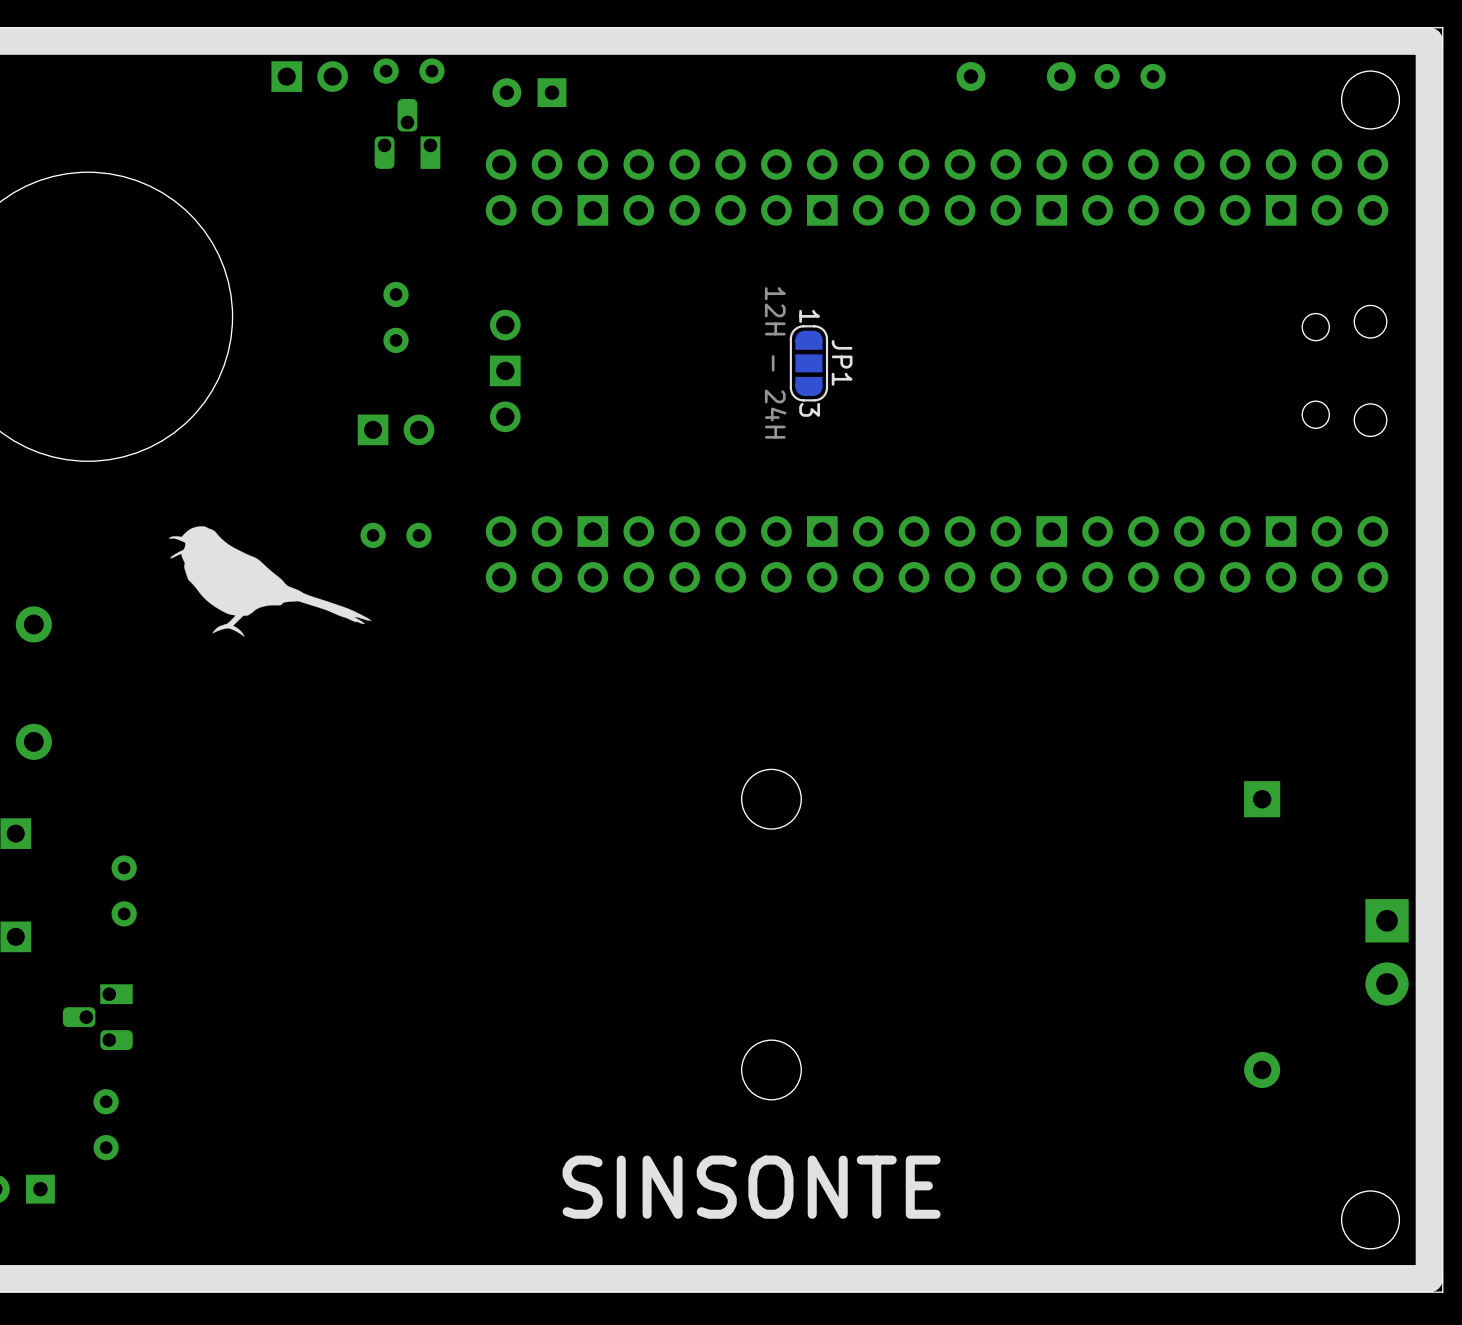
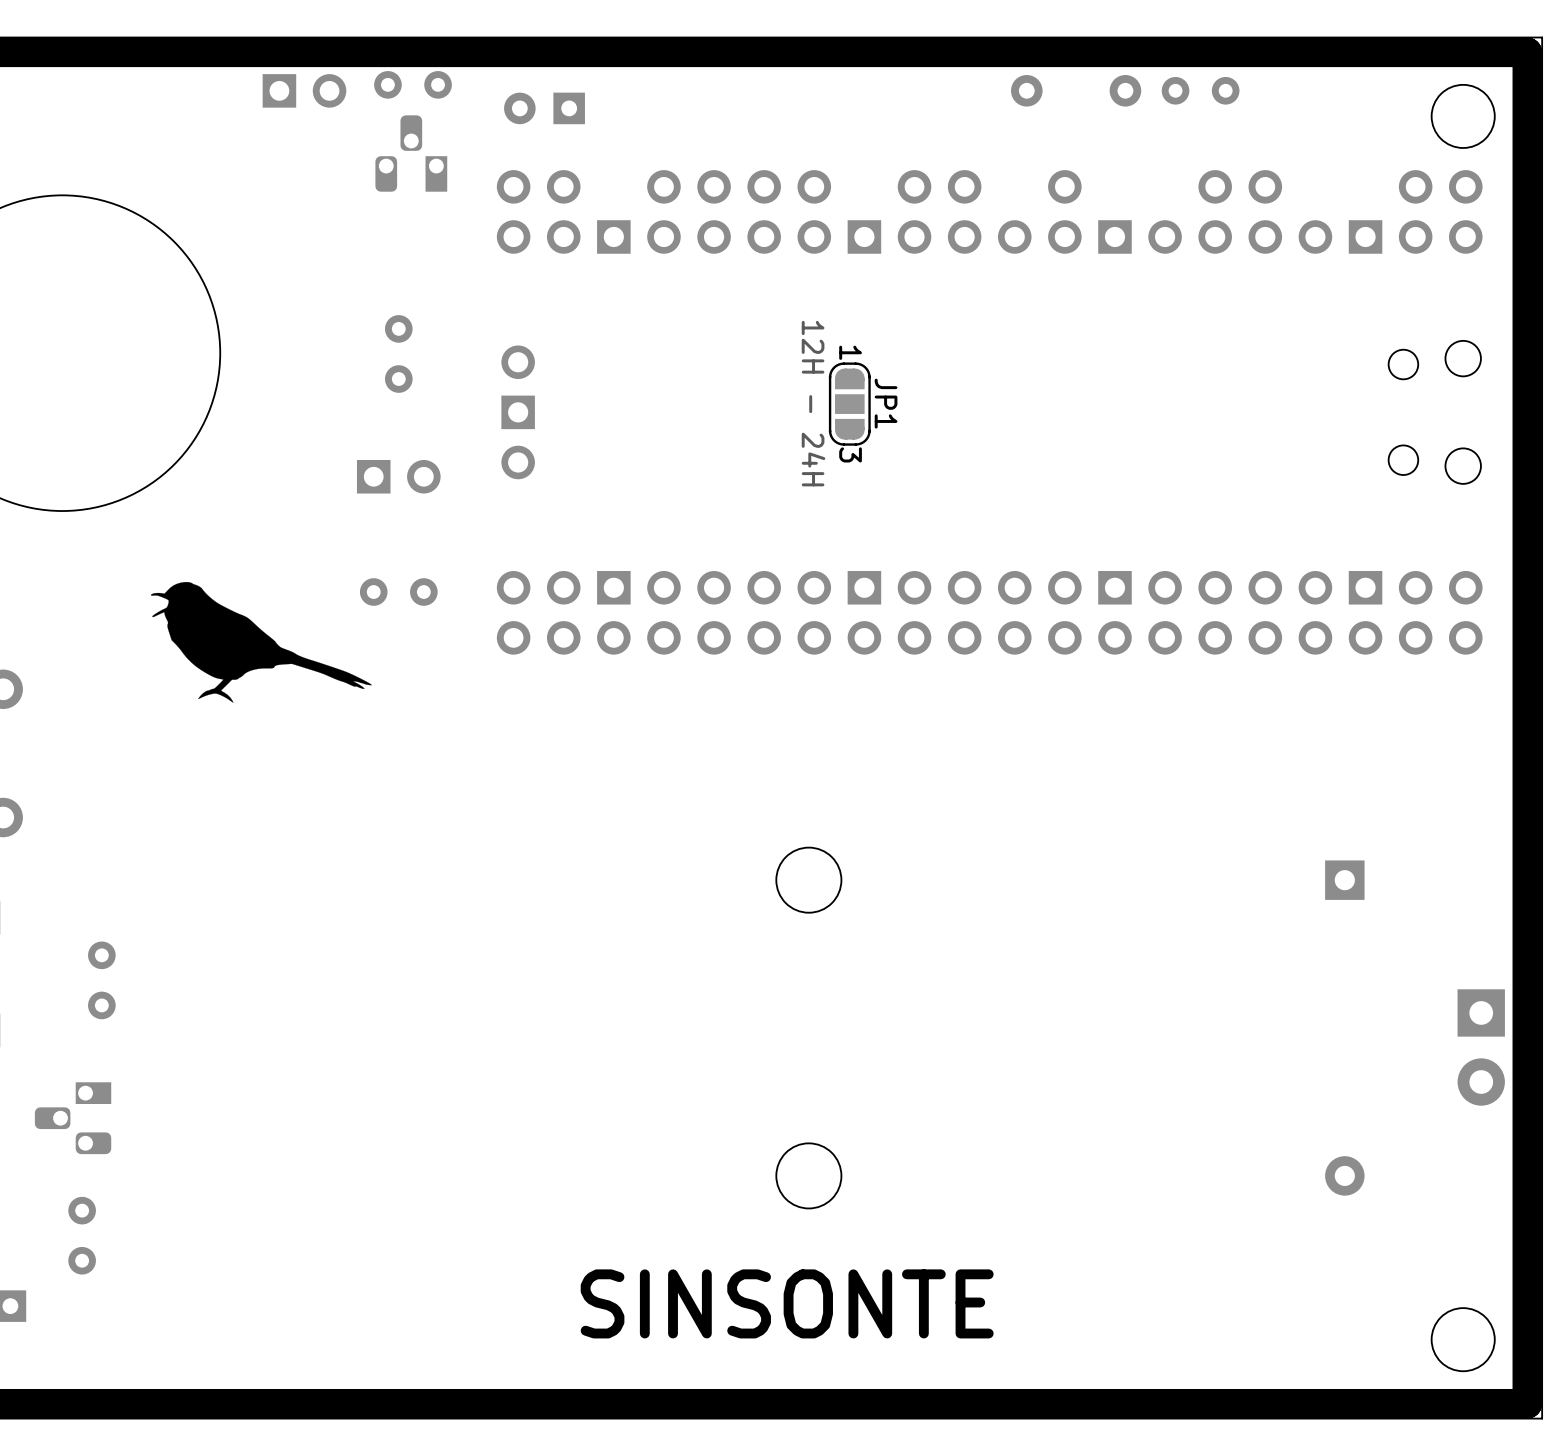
part: (937, 164) -> none

